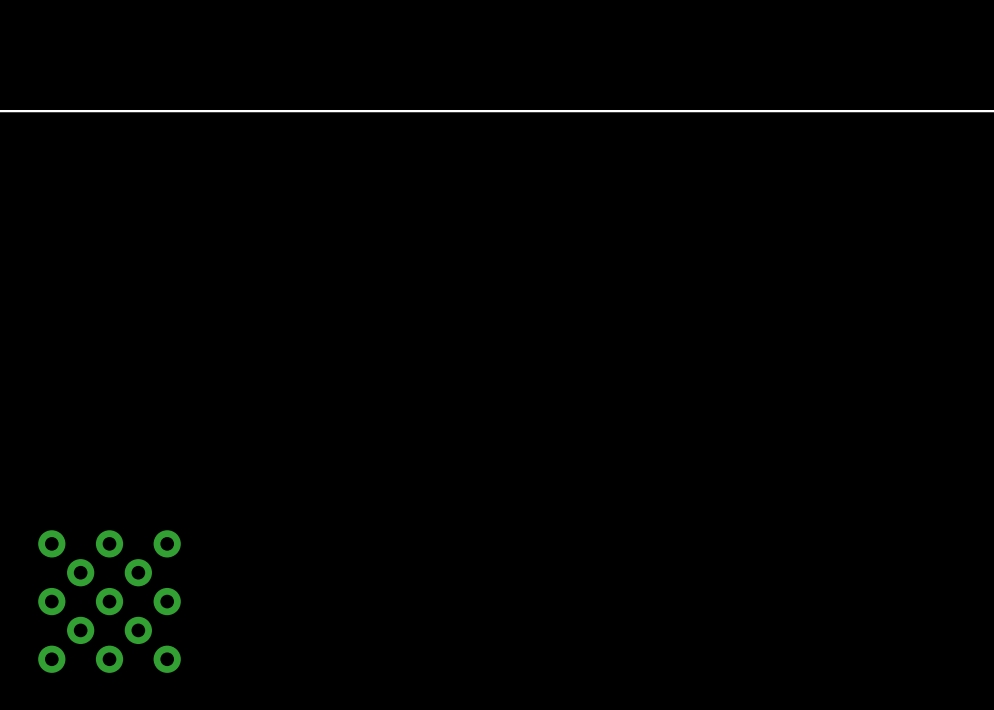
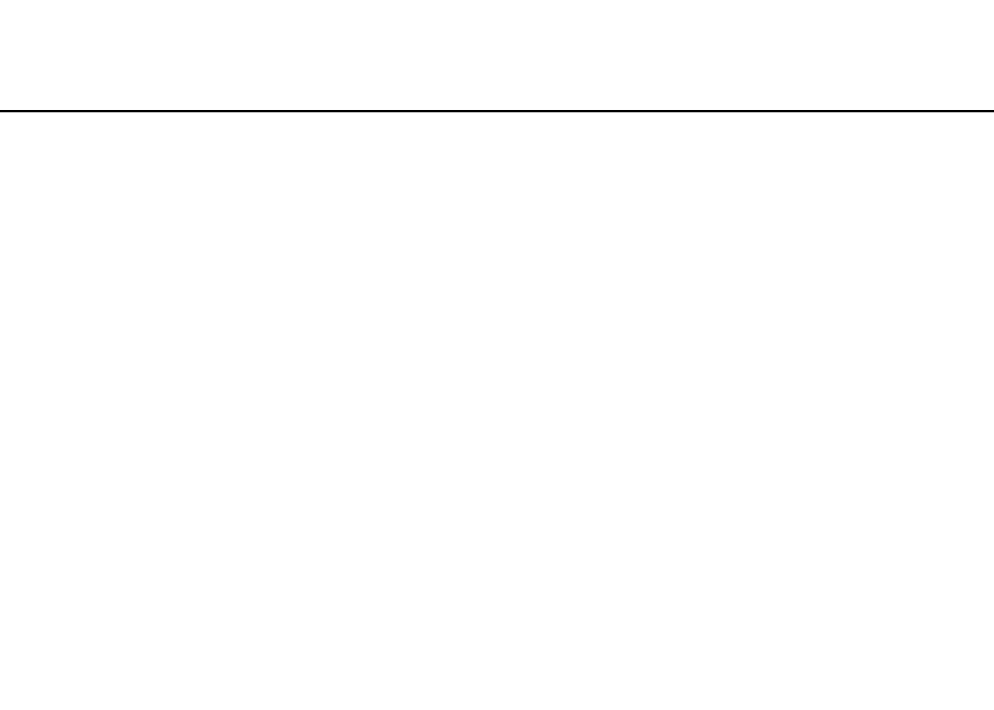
via: (51, 543) -> none
via: (109, 543) -> none
via: (167, 543) -> none
via: (80, 572) -> none
via: (138, 572) -> none
via: (51, 601) -> none
via: (109, 601) -> none
via: (167, 601) -> none
via: (80, 630) -> none
via: (138, 630) -> none
via: (51, 659) -> none
via: (109, 659) -> none
via: (167, 659) -> none

